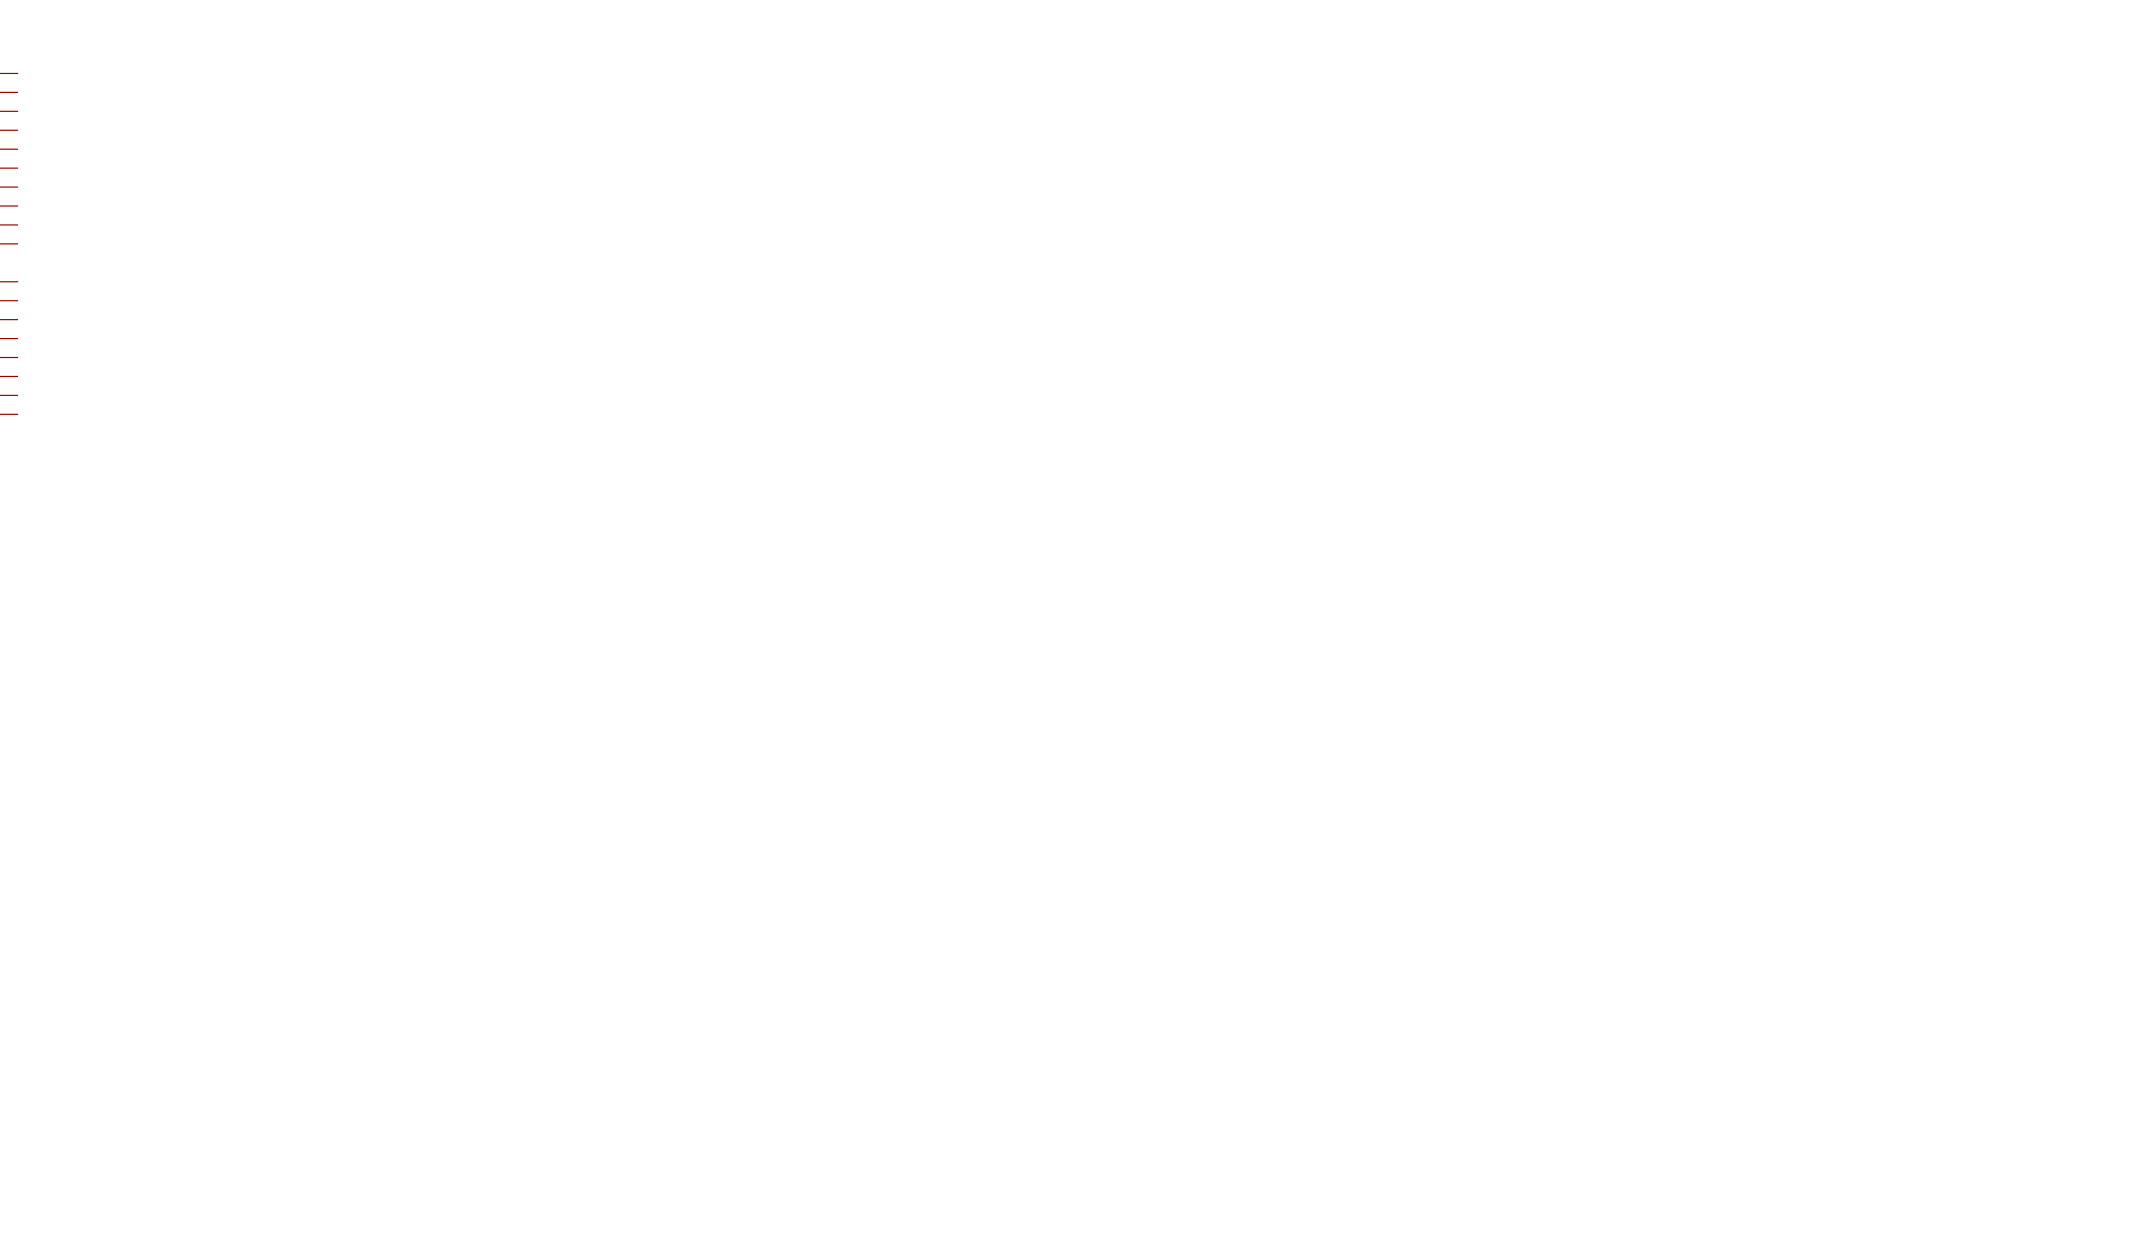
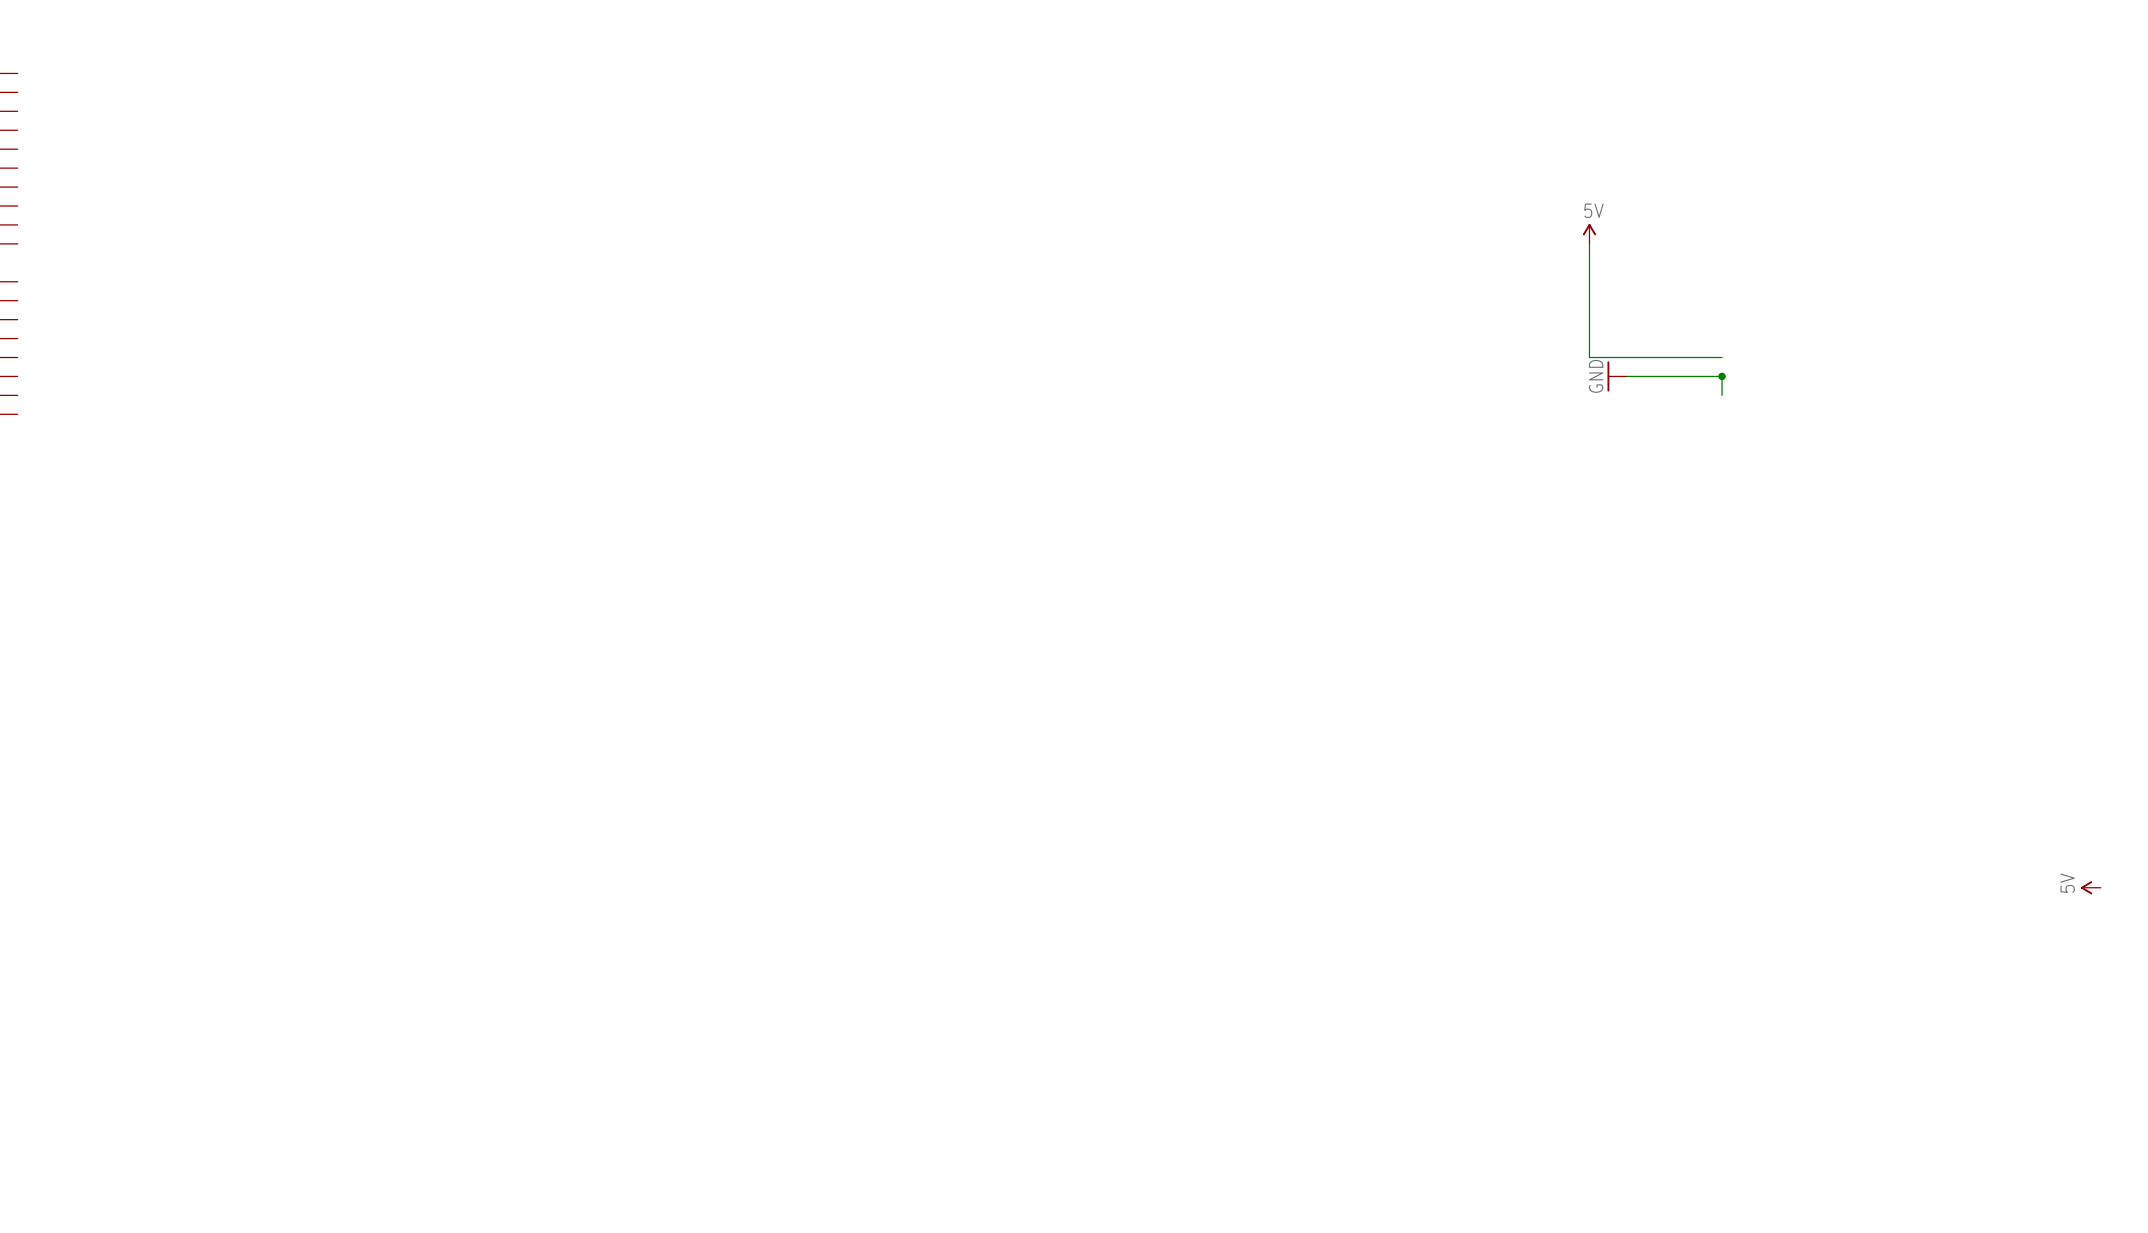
power symbol: none -> 5V (1589, 233)
wire: none -> (1589, 243) (1589, 357) (1722, 357)
power symbol: none -> GND (1617, 376)
wire: none -> (1627, 376) (1722, 376) (1722, 395)
junction: none -> (1722, 376)
power symbol: none -> 5V (2090, 887)

